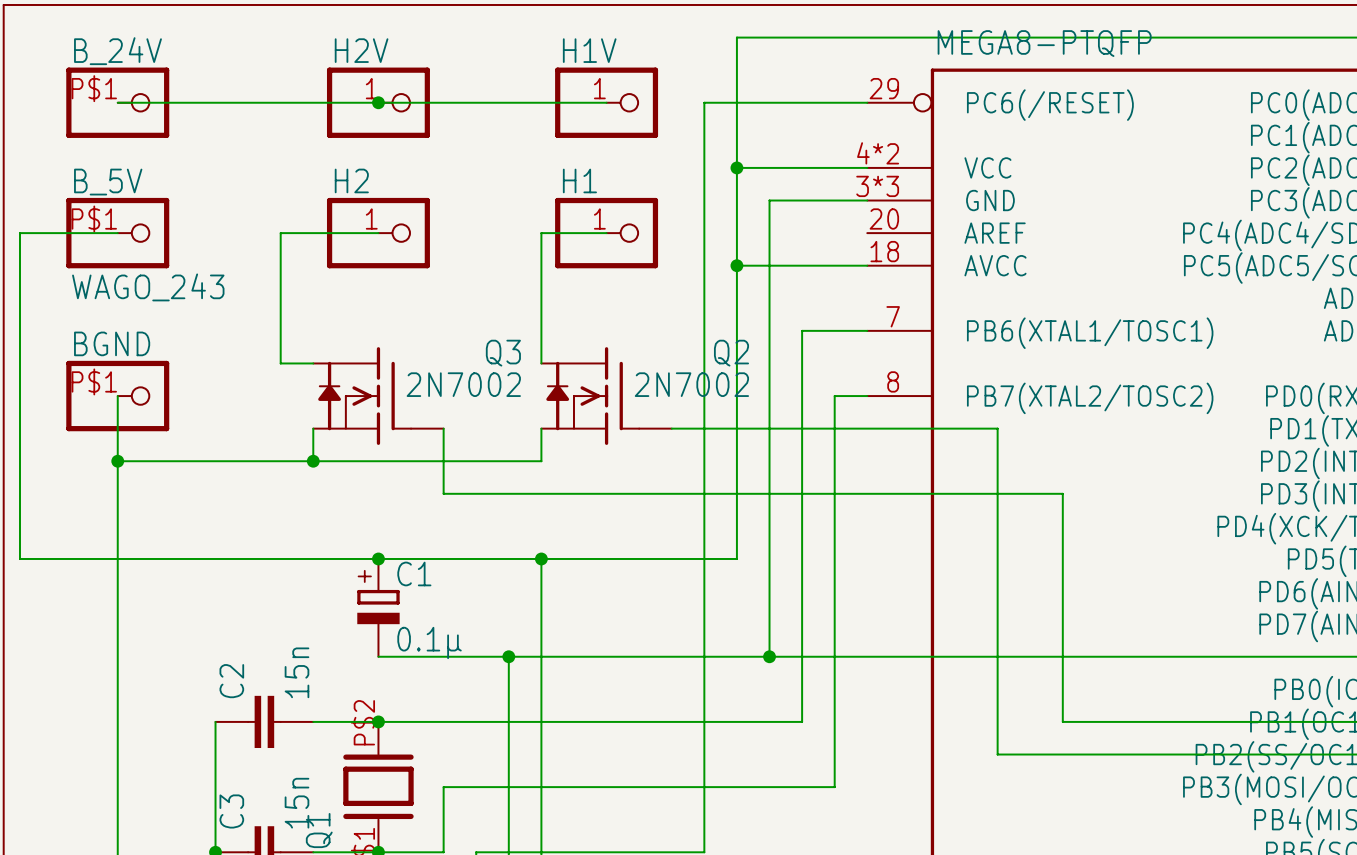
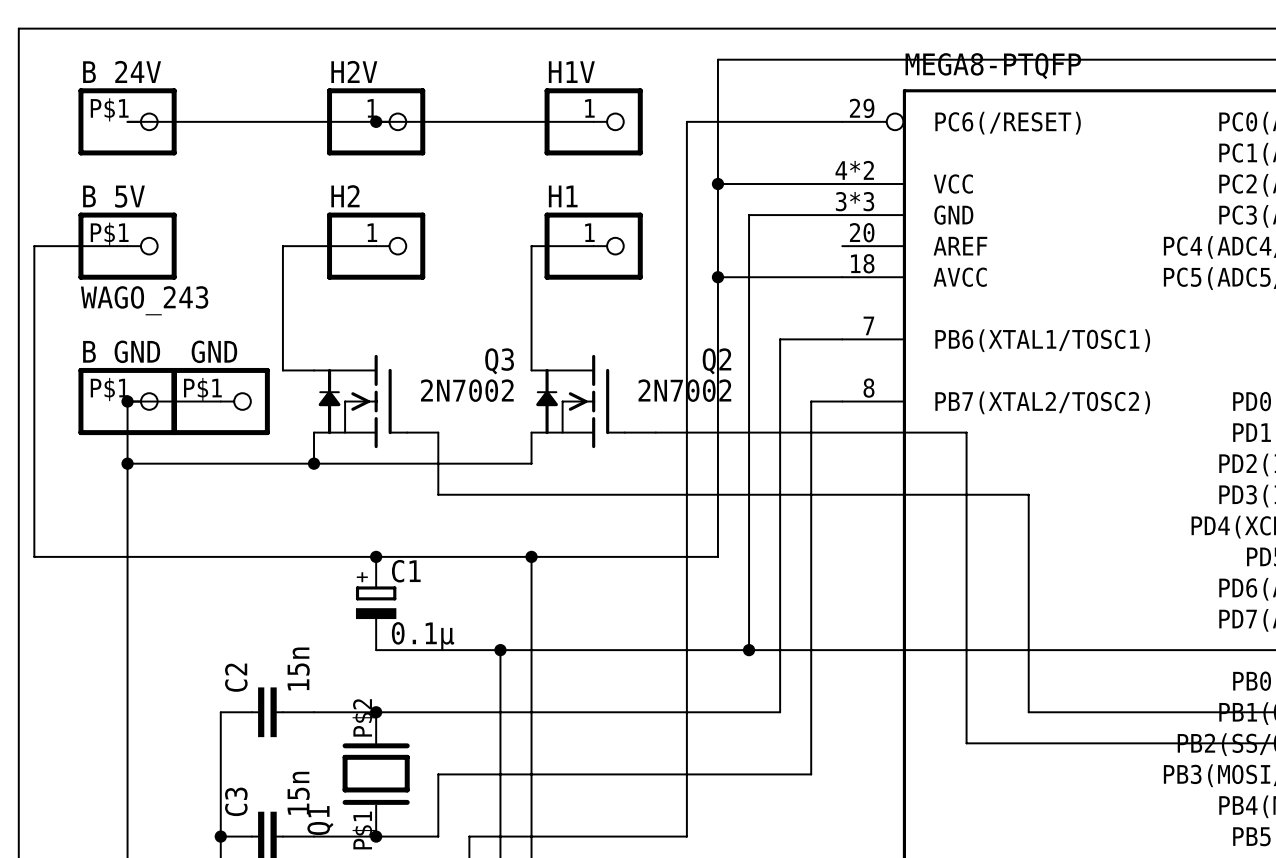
BGND name: BGND (112, 343) -> B_GND (121, 355)
wire: none -> (127, 401) (220, 401)
junction: none -> (127, 401)
_GND: none -> (220, 401)

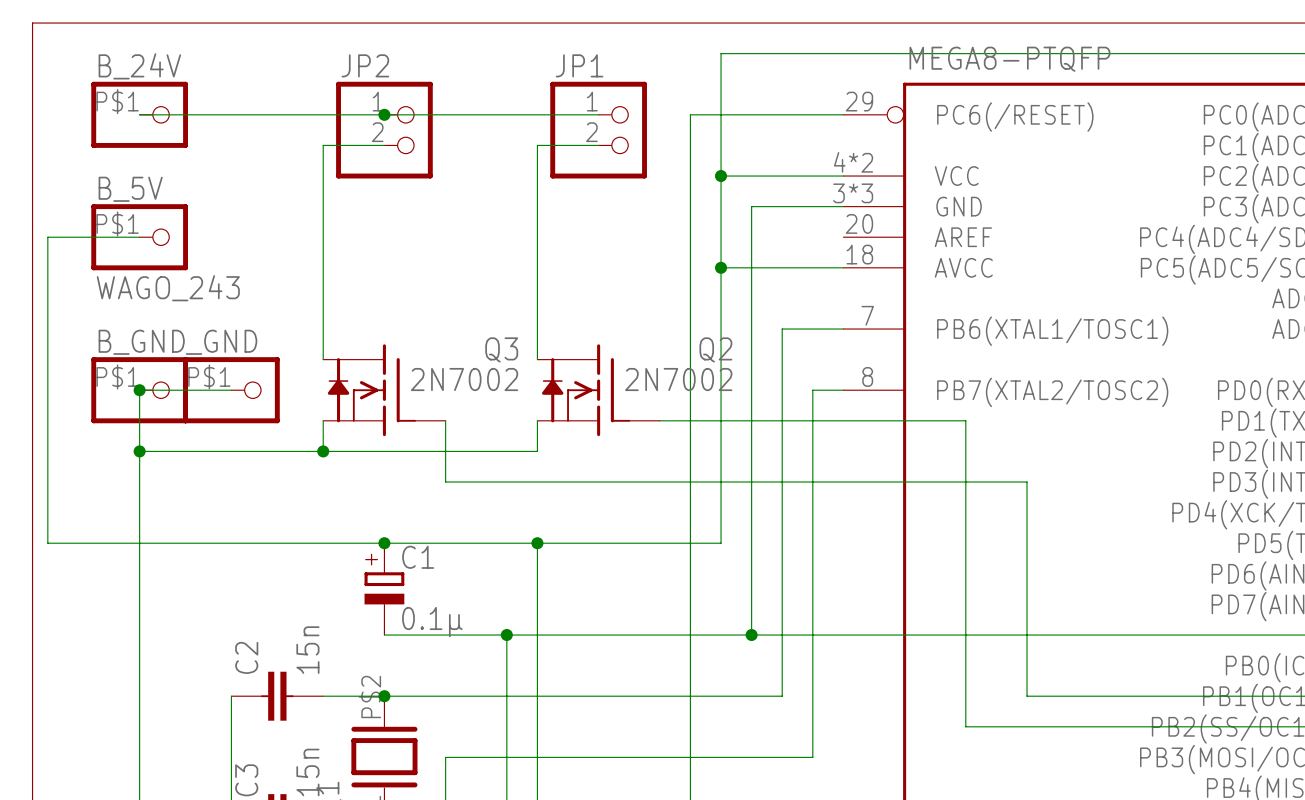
H2V: (376, 121) -> none
H1V: (593, 121) -> none
JP2: none -> (384, 130)
JP1: none -> (598, 130)
wire: (376, 246) (282, 246) (282, 370) (314, 370) -> (384, 145) (323, 145) (323, 359)
H2: (376, 246) -> none
wire: (531, 246) (593, 246) -> (537, 237) (537, 145) (598, 145)
H1: (593, 246) -> none

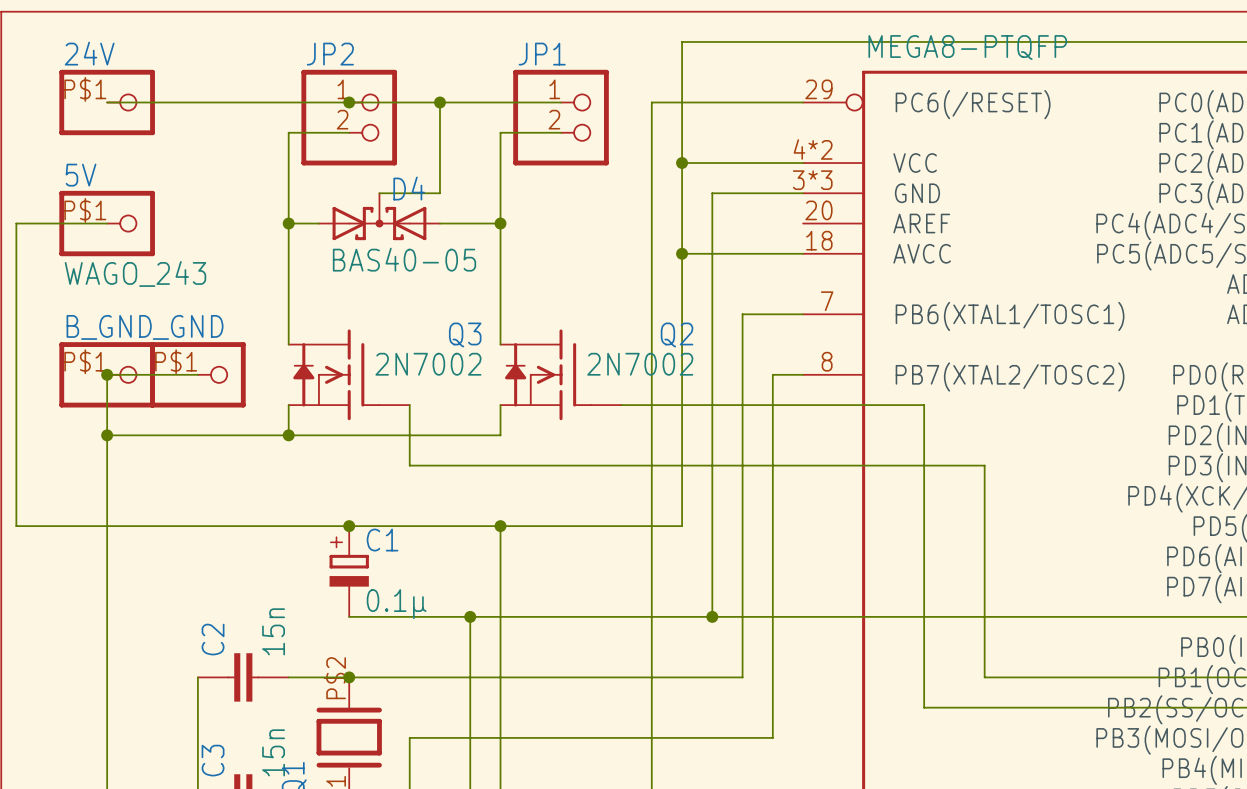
B_24V name: B_24V (139, 66) -> 24V (89, 53)
wire: none -> (439, 102) (439, 193) (379, 193)
junction: none -> (439, 102)
B_5V name: B_5V (130, 189) -> 5V (81, 175)
D4: none -> BAS40-05 (379, 216)
wire: none -> (288, 223) (318, 223)
junction: none -> (288, 223)
wire: none -> (439, 223) (500, 223)
junction: none -> (500, 223)

